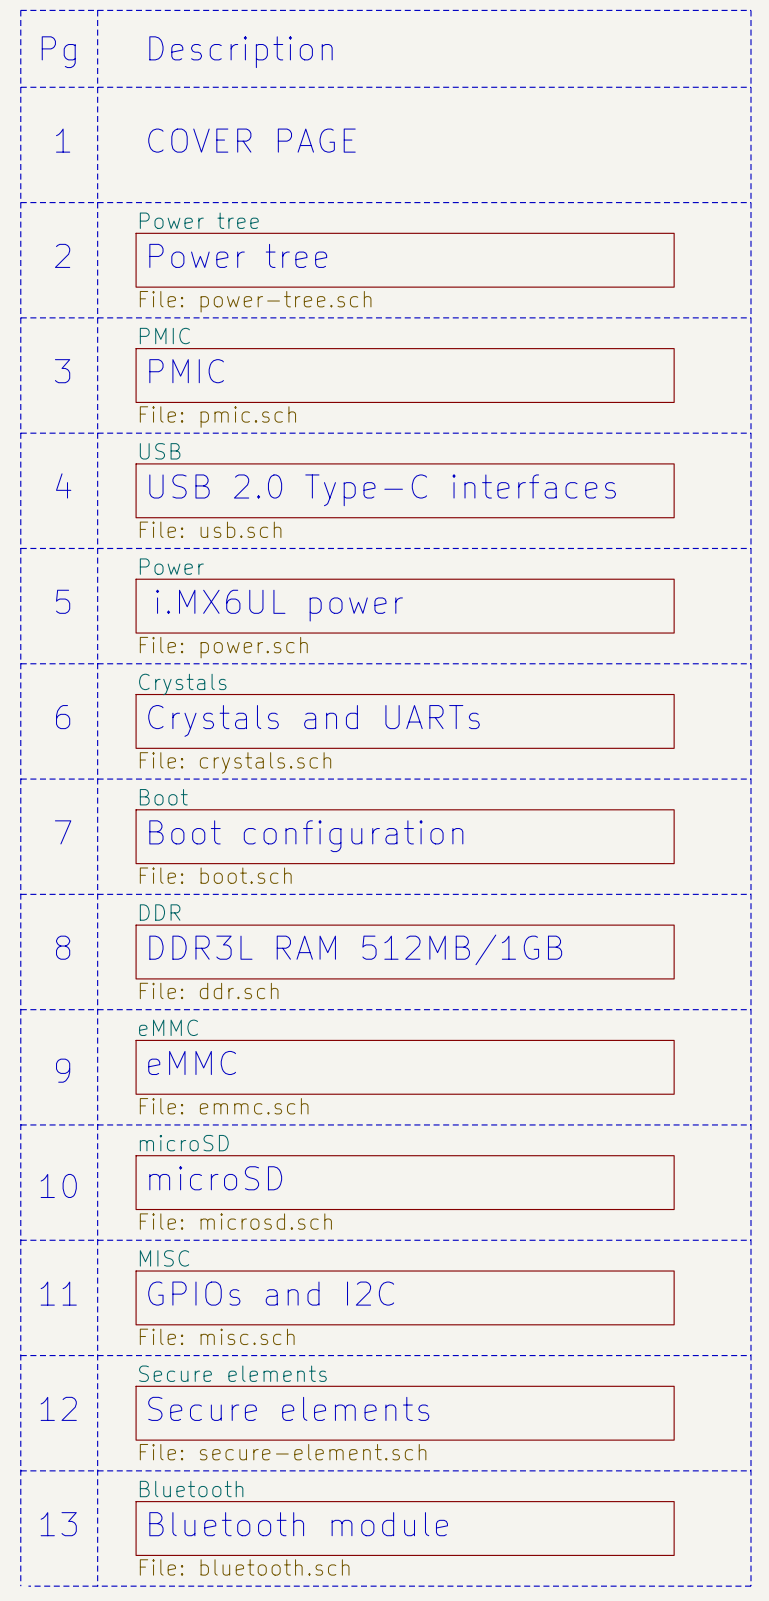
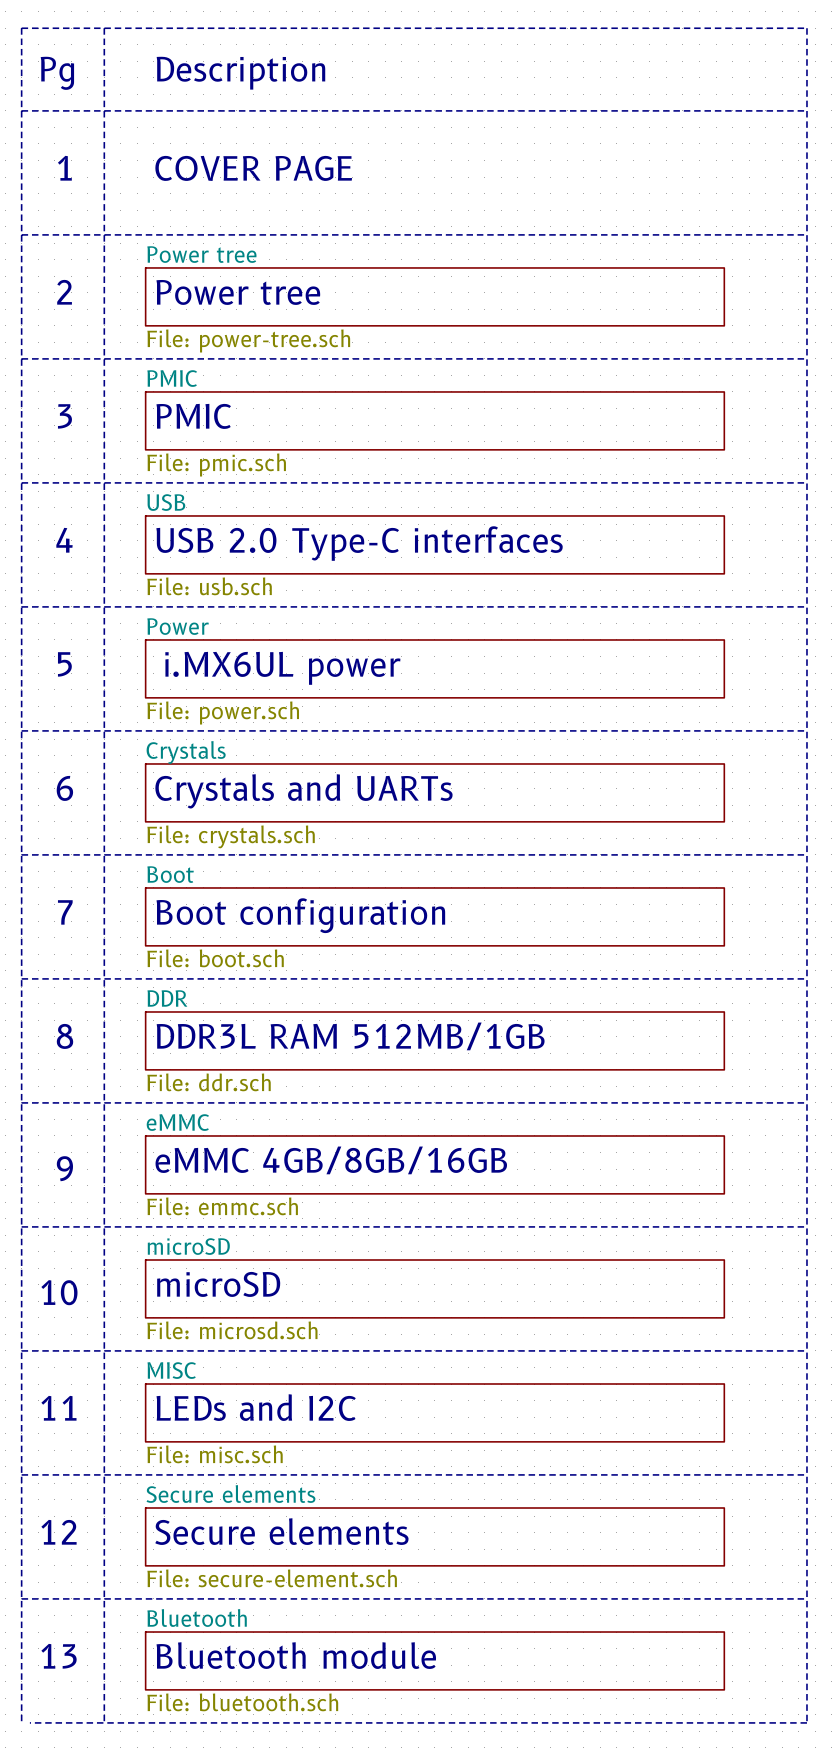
text: eMMC (192, 1062) -> eMMC 4GB/8GB/16GB (331, 1160)
text: GPIOs and I2C (271, 1293) -> LEDs and I2C (256, 1407)

